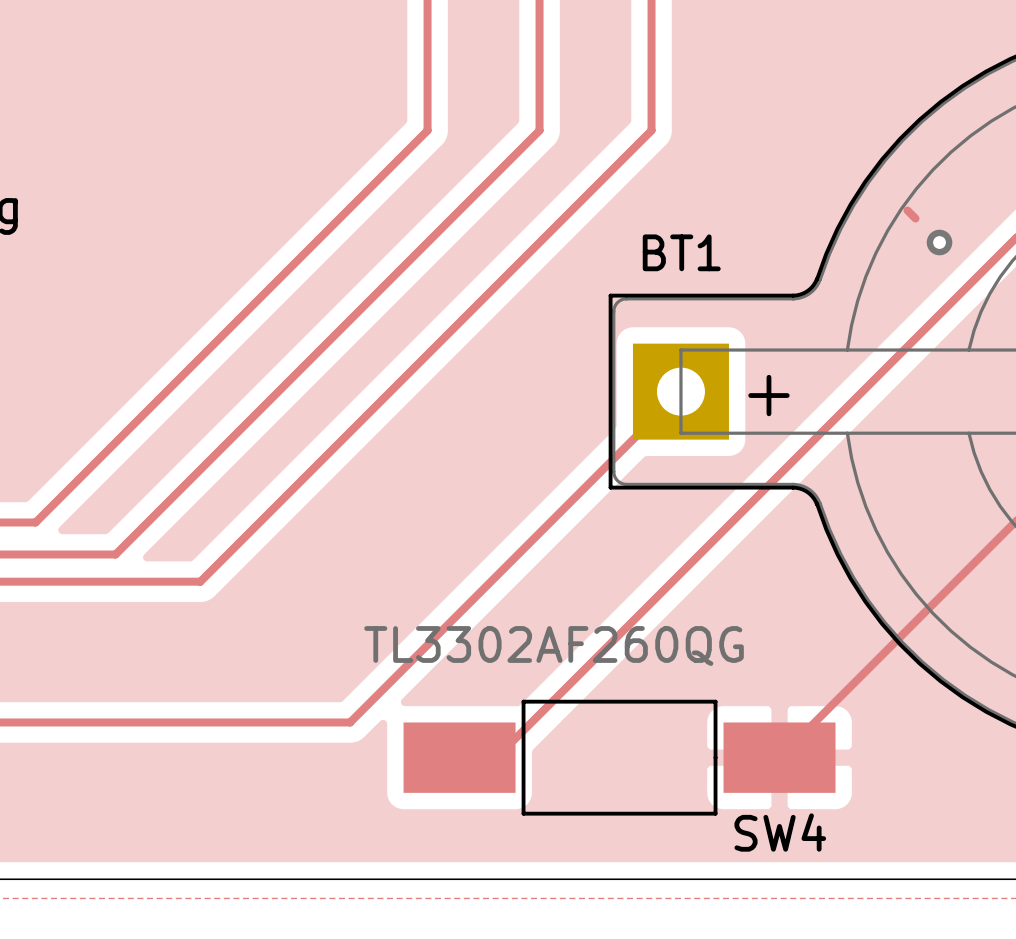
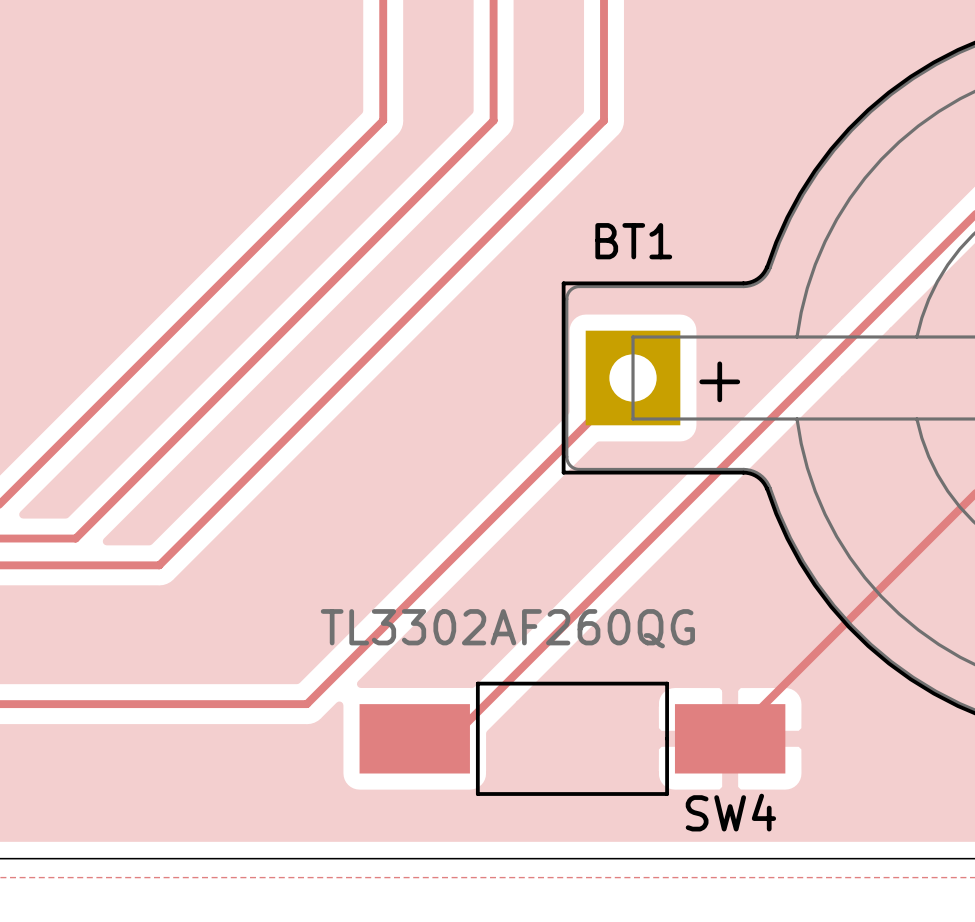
track: (907, 210) (915, 218) -> none
via: (939, 242) -> none

